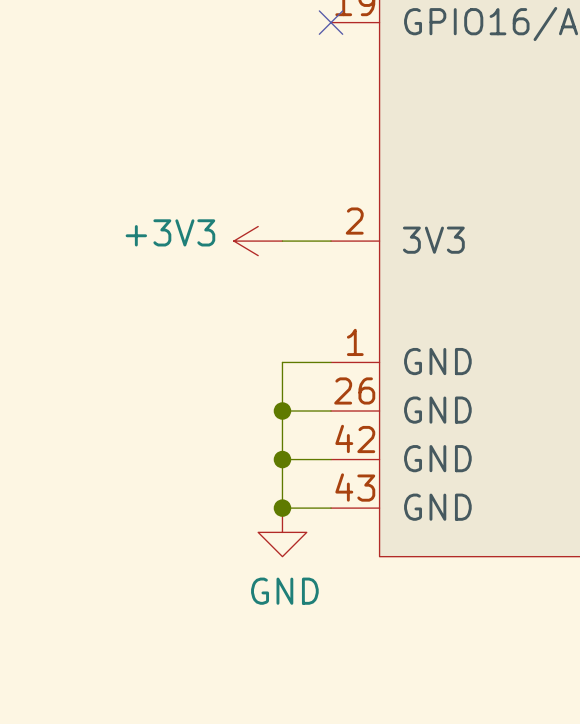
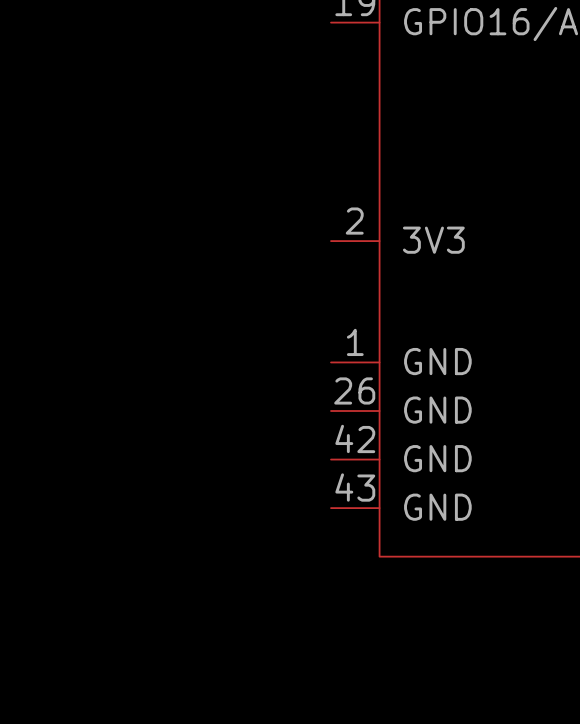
no-connect mark: (331, 22) -> none
power symbol: +3V3 (258, 241) -> none
wire: (282, 241) (331, 241) -> none
wire: (331, 362) (282, 362) (282, 508) (331, 508) -> none
wire: (282, 411) (331, 411) -> none
junction: (282, 411) -> none
wire: (282, 459) (331, 459) -> none
junction: (282, 459) -> none
junction: (282, 508) -> none
power symbol: GND (282, 532) -> none

